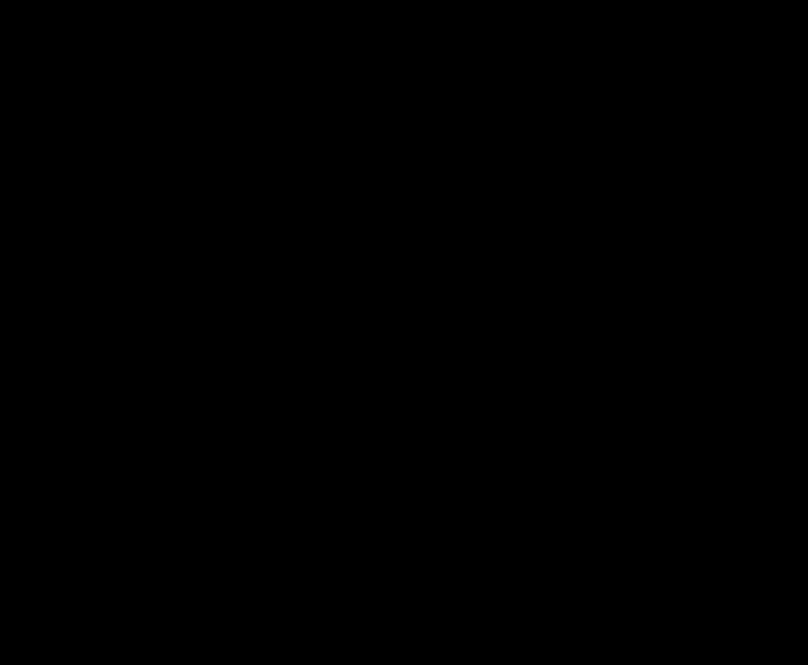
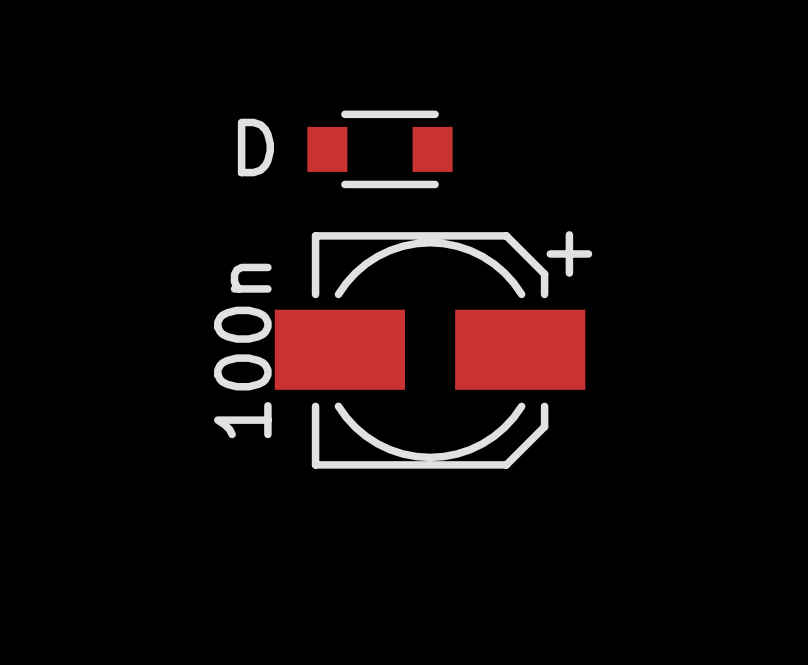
part: none -> D (379, 149)
part: none -> 100n (430, 350)

